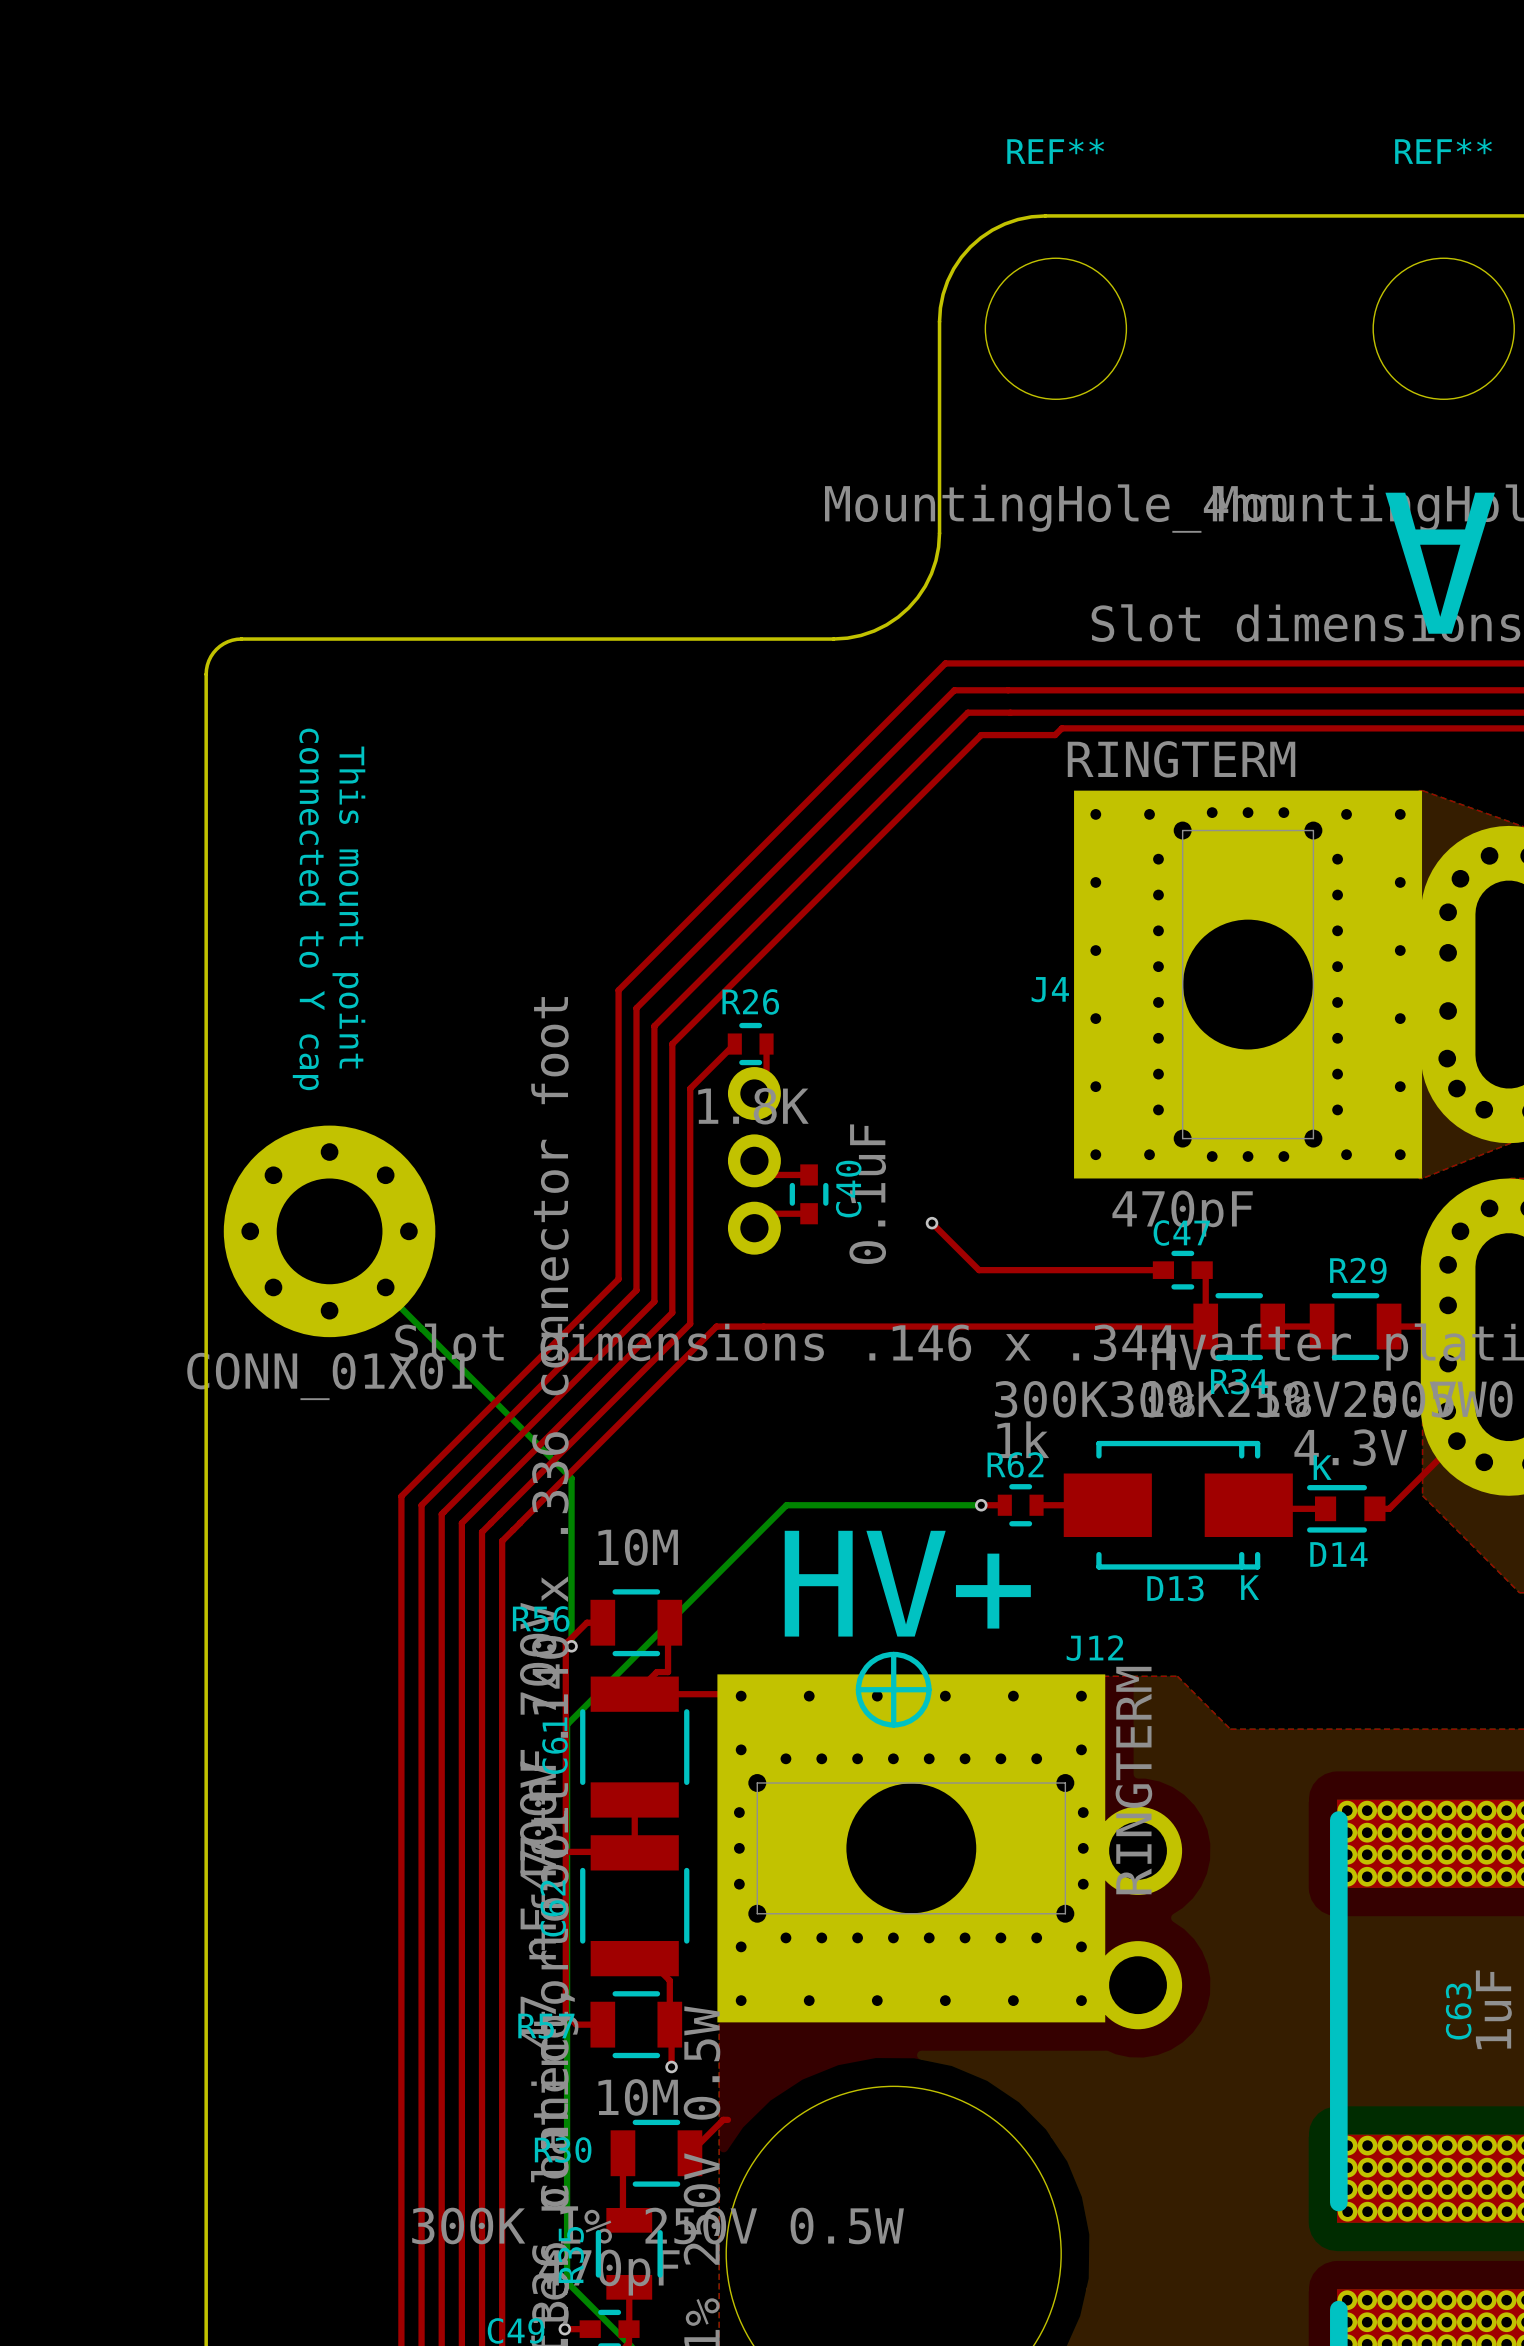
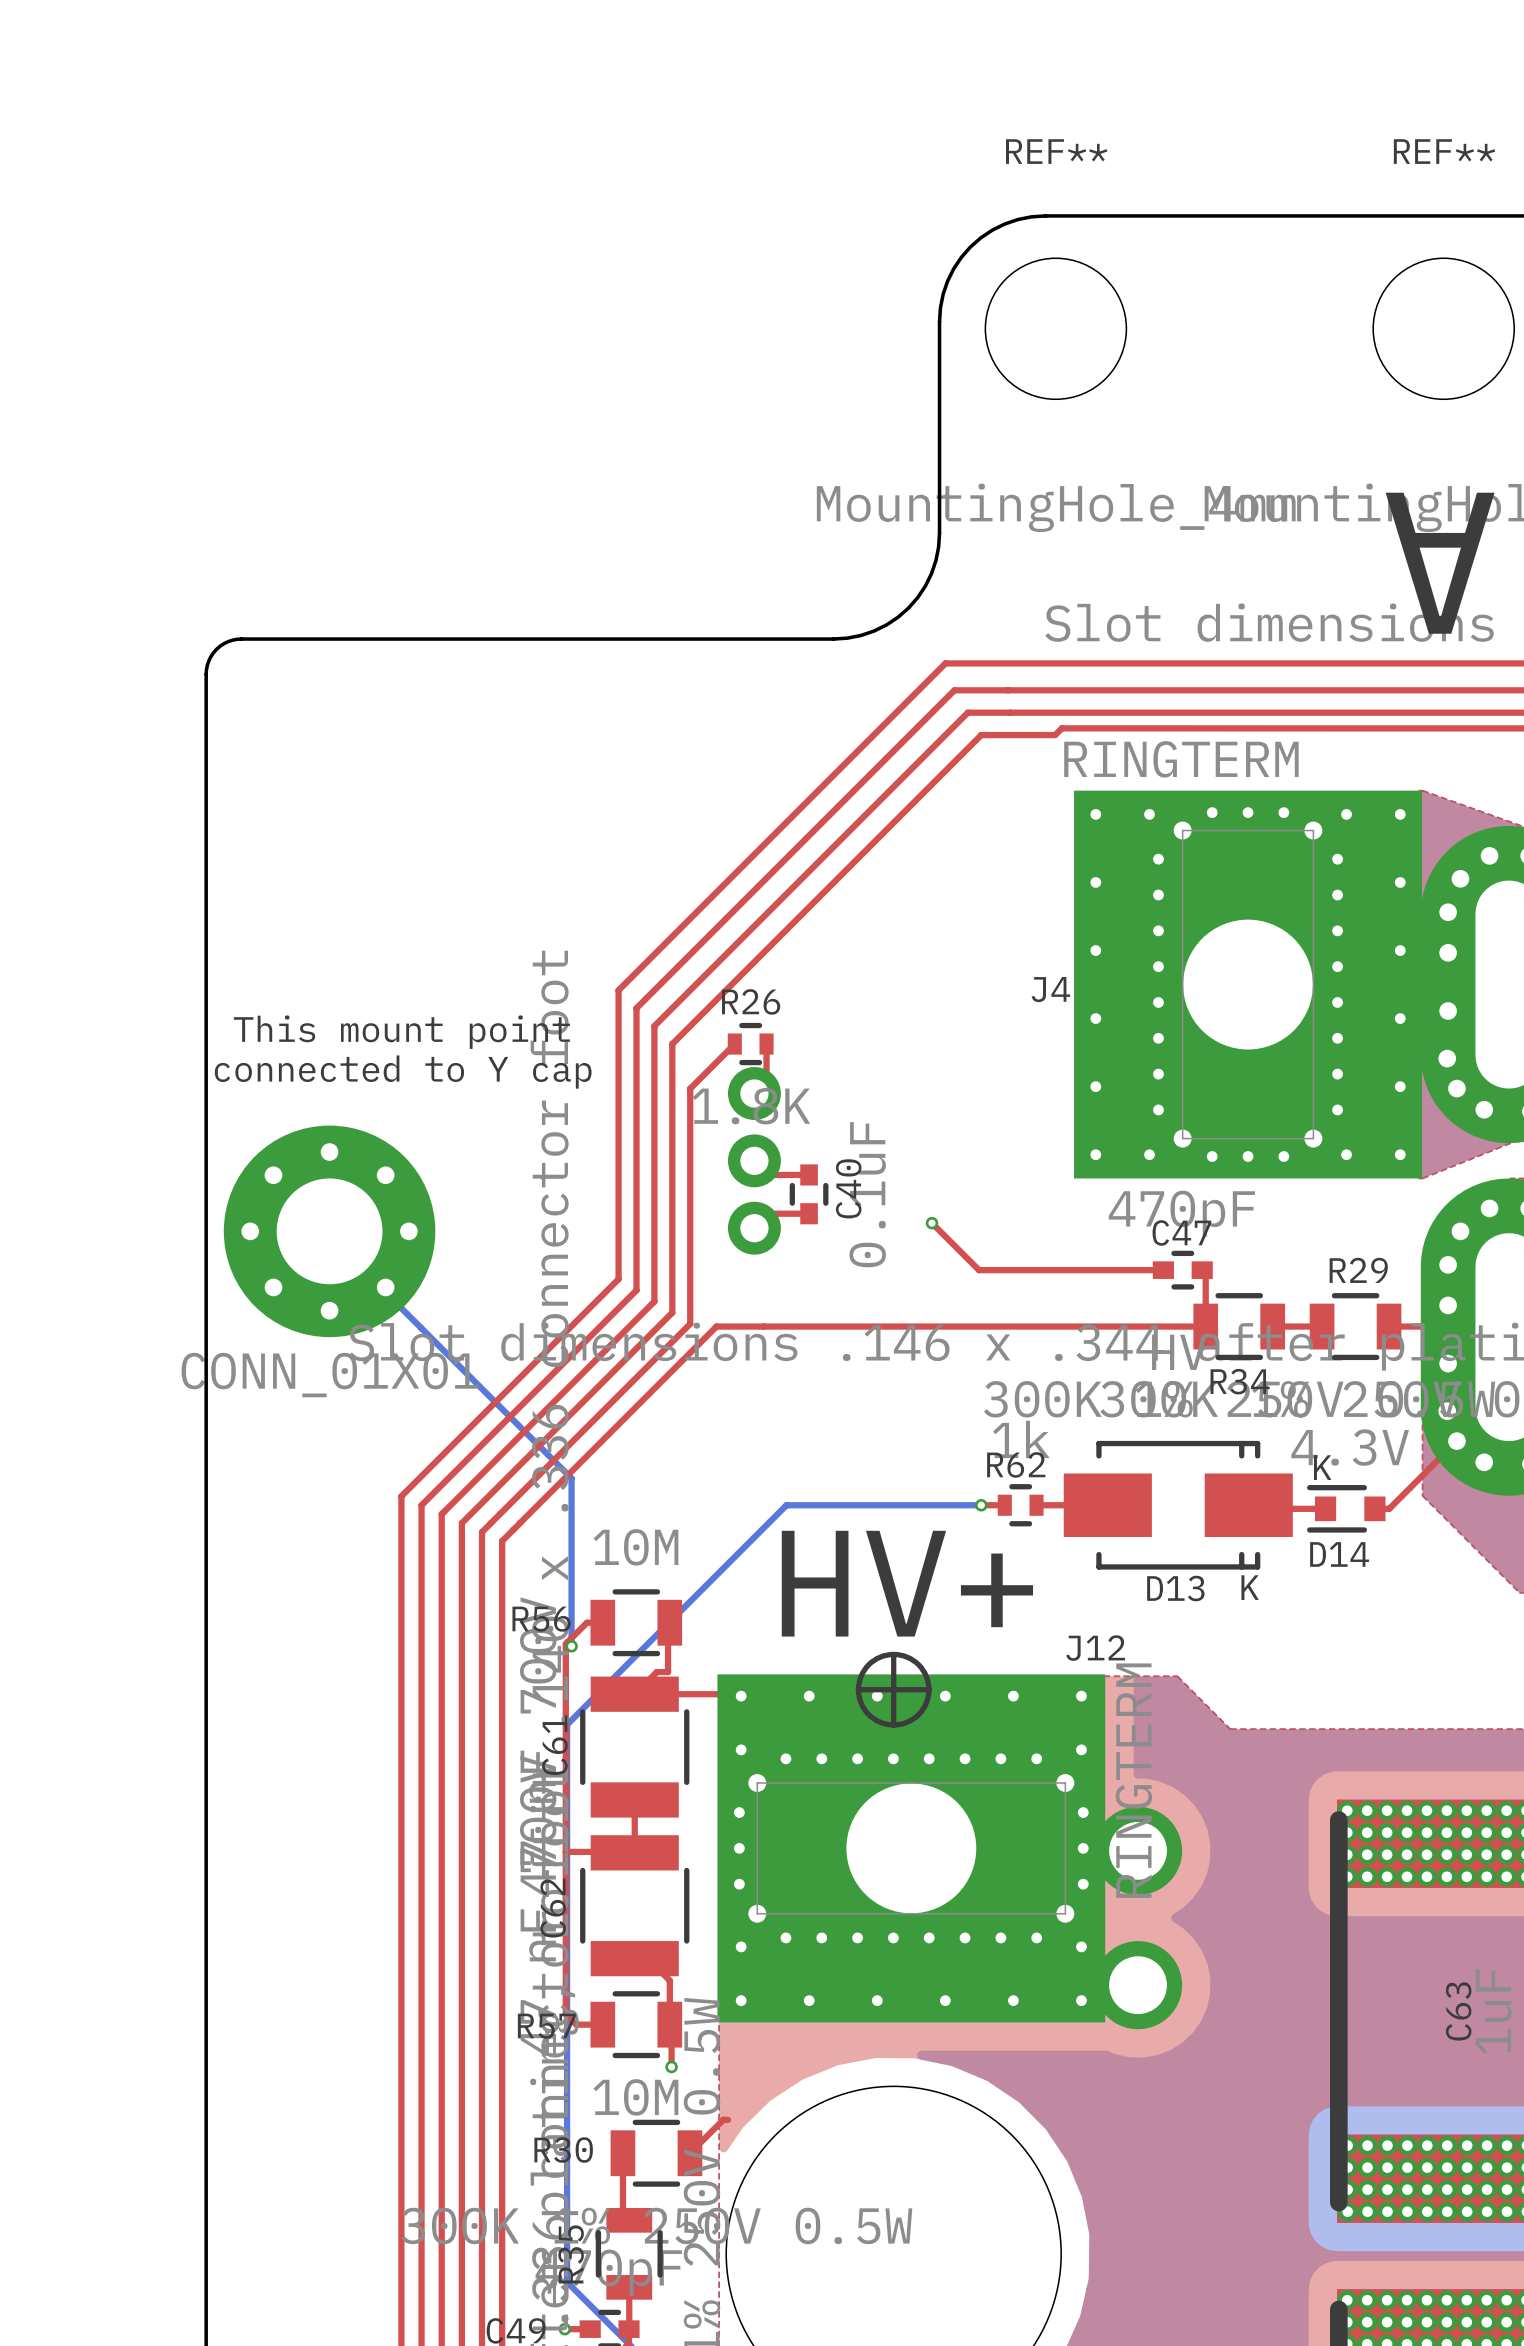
text rotation: 0° (348, 907) -> 90° counterclockwise (401, 1032)
text rotation: 0° (309, 909) -> 90° counterclockwise (403, 1072)

